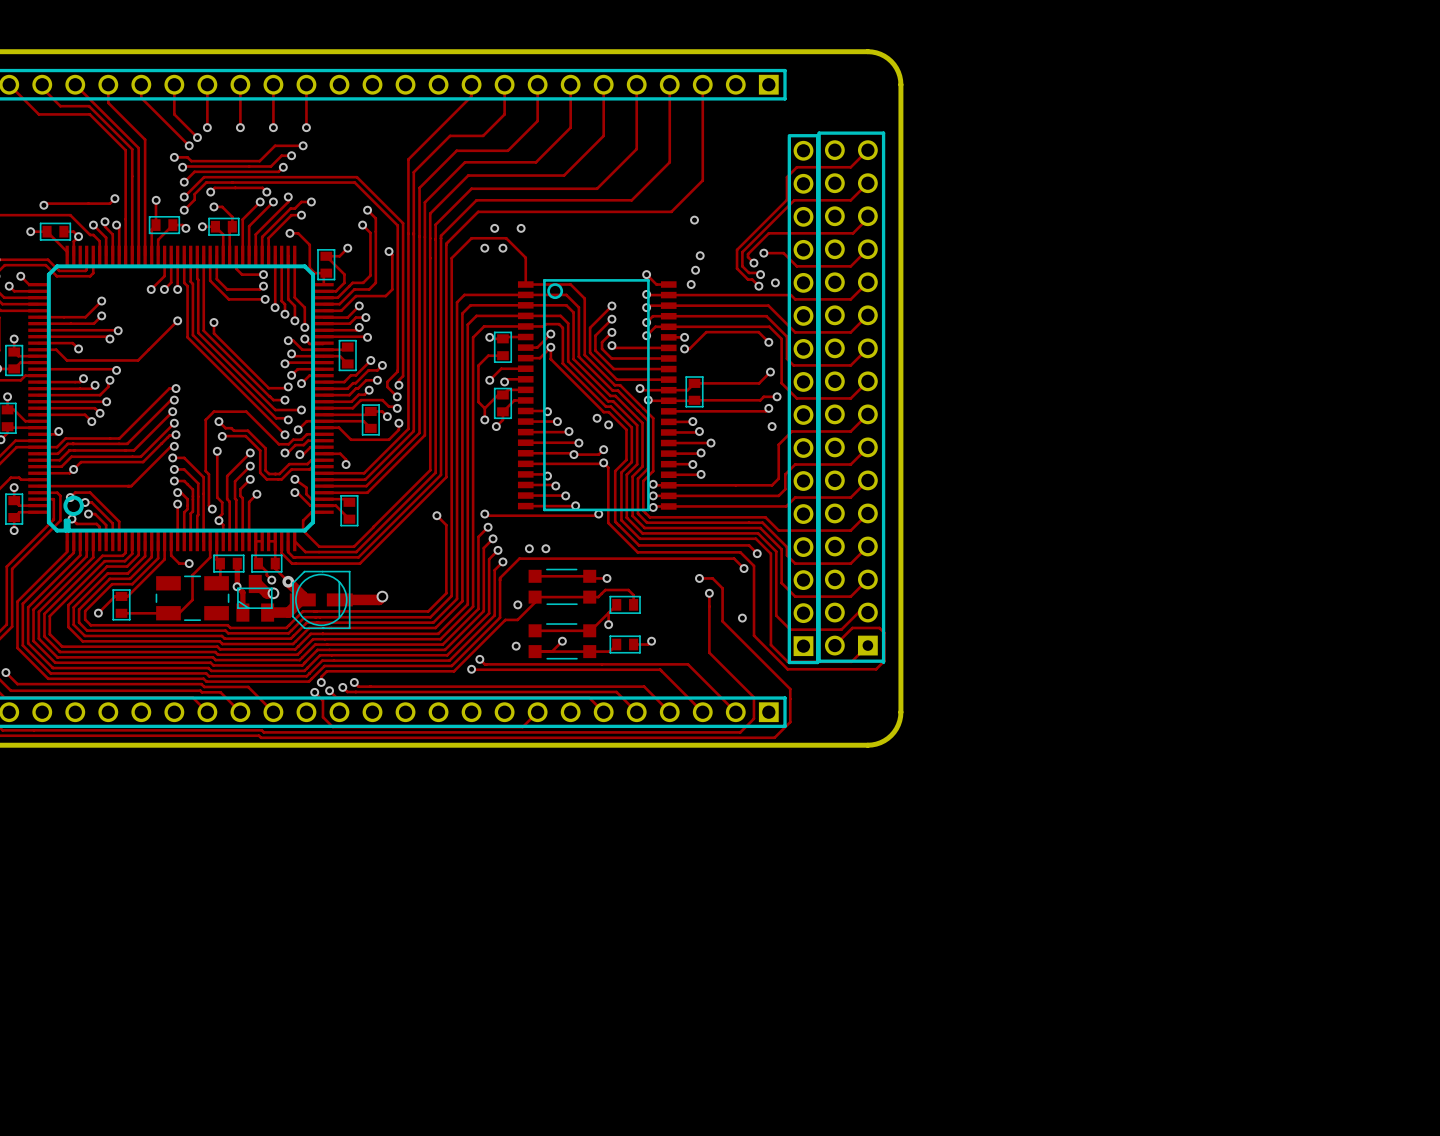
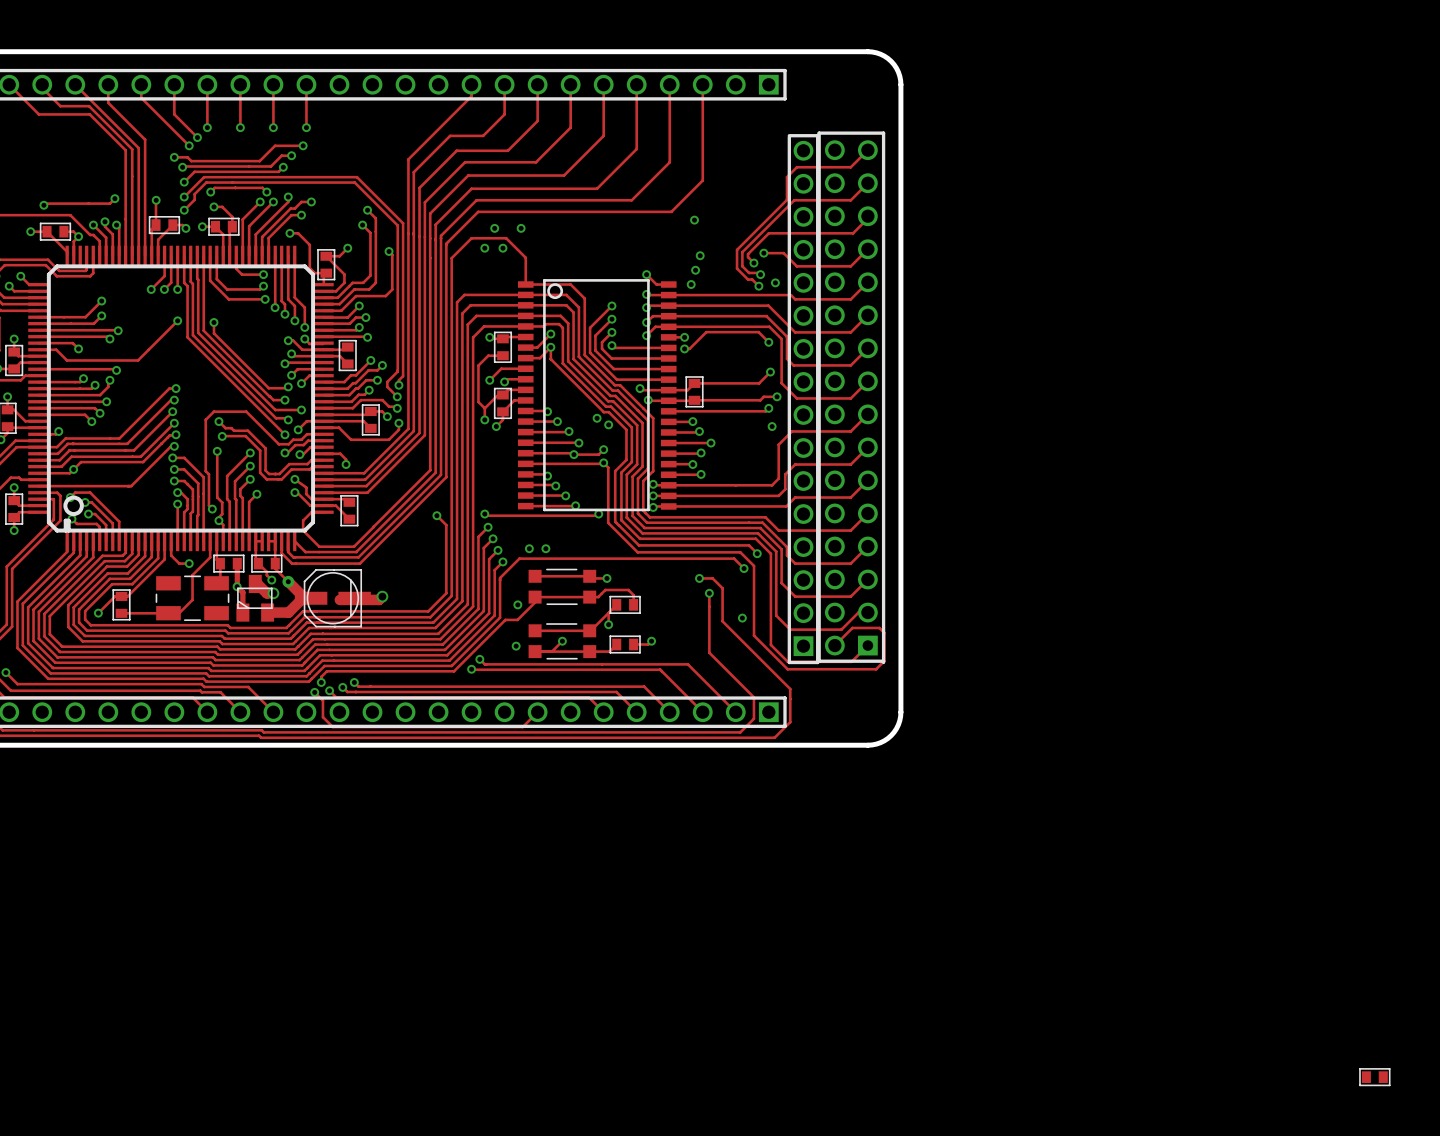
part footprint: [289, 570, 353, 630] -> [294, 569, 371, 628]
part: none -> (1374, 1077)

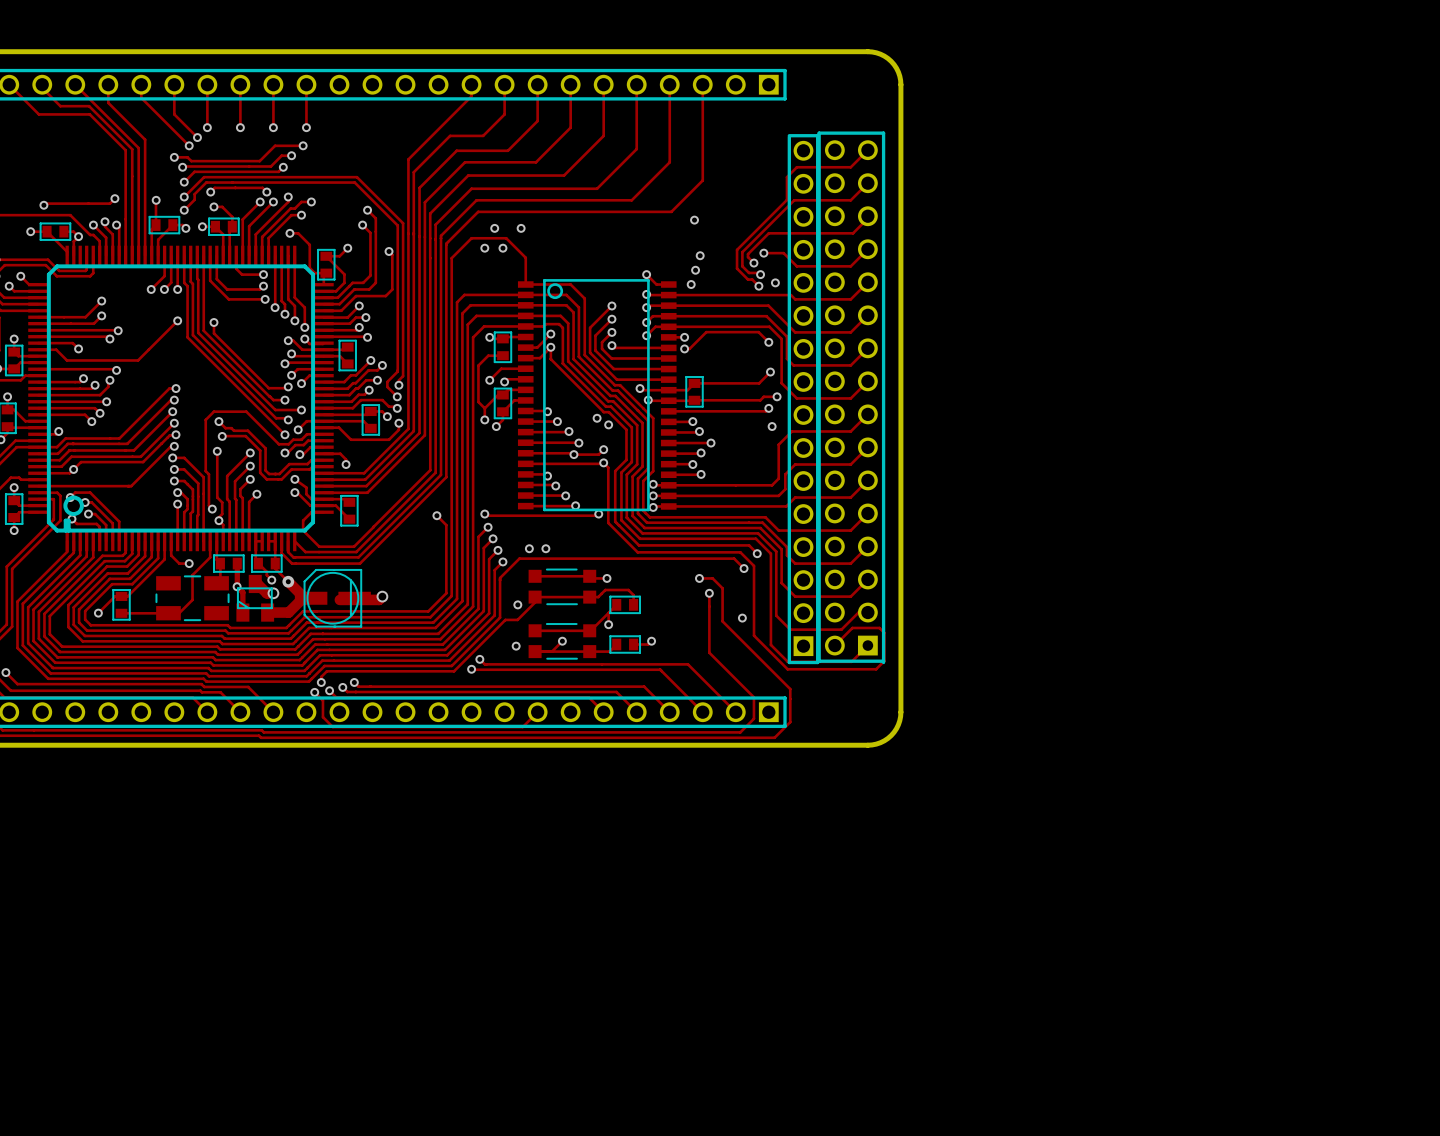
part: (1374, 1077) -> none

